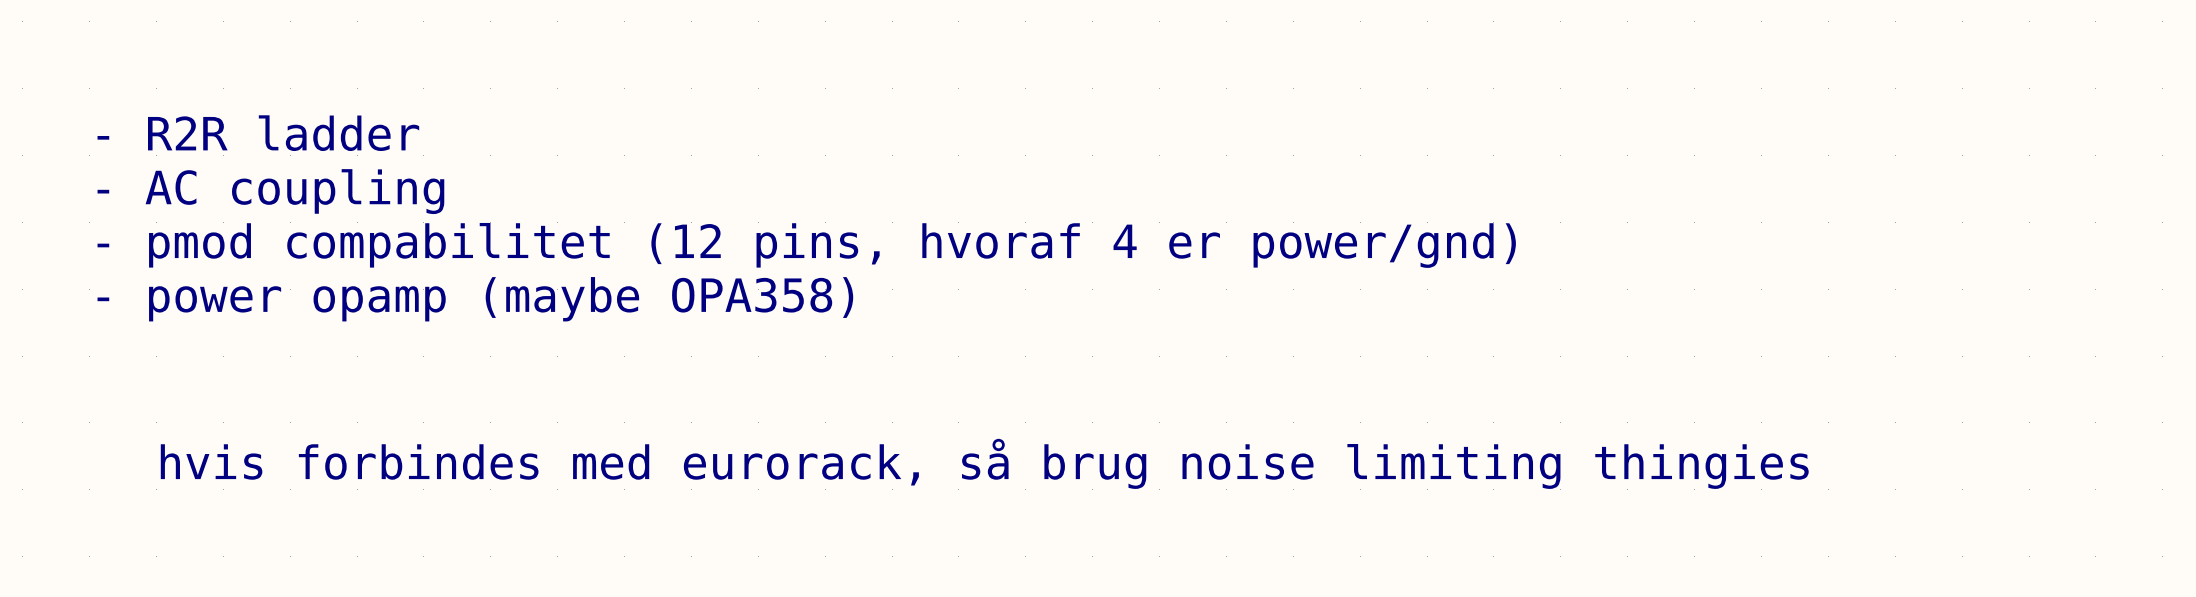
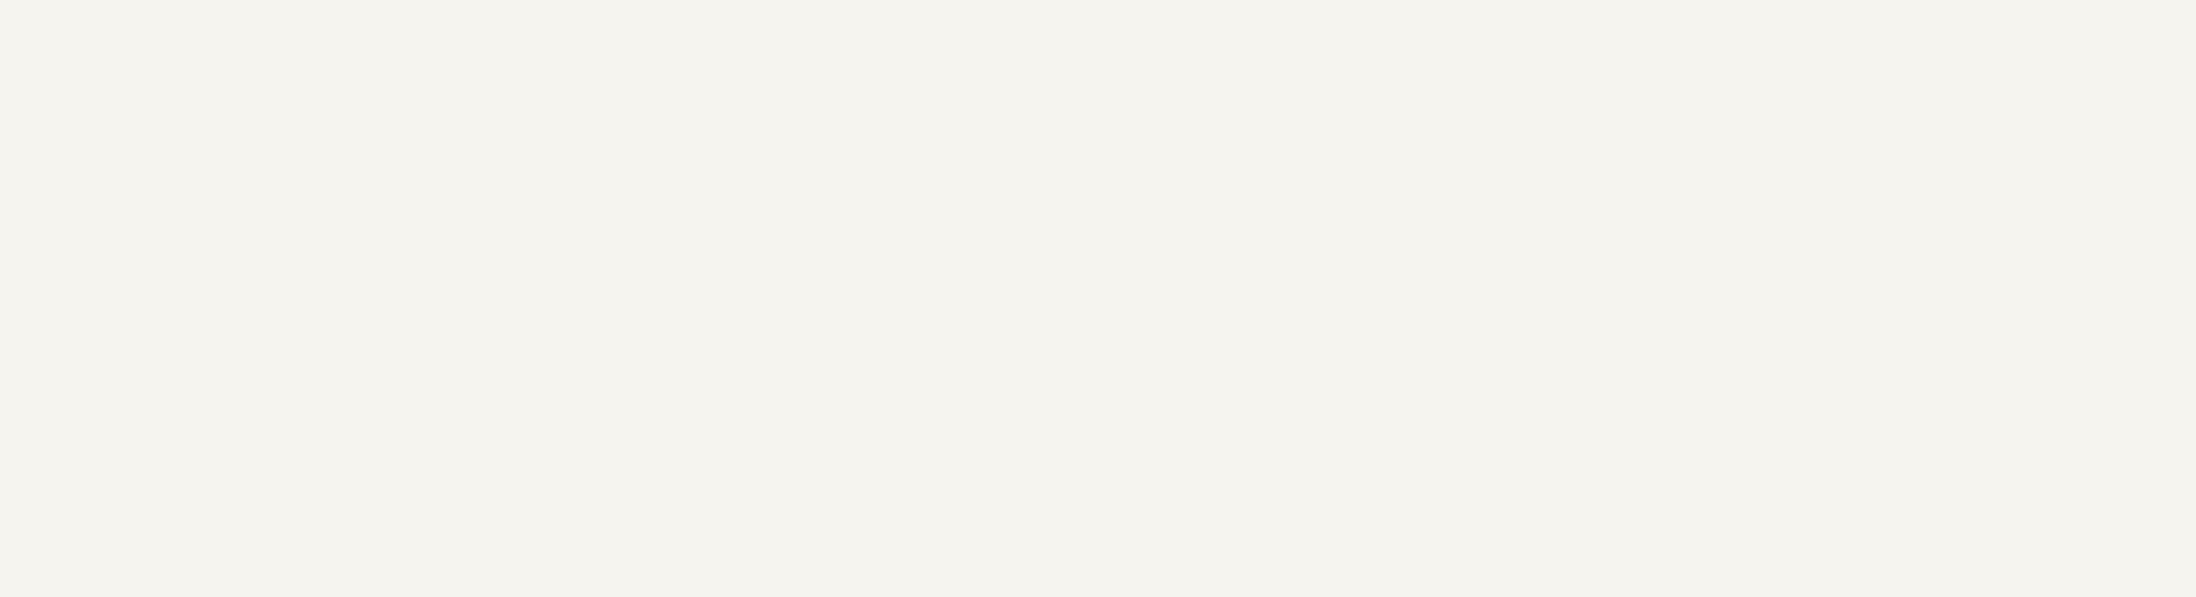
text: - R2R ladder (258, 133) -> none
text: - AC coupling (270, 191) -> none
text: - pmod compabilitet (12 pins, hvoraf 4 er power/gnd) (806, 245) -> none
text: - power opamp (maybe OPA358) (475, 299) -> none
text: hvis forbindes med eurorack, så brug noise limiting thingies (984, 463) -> none

